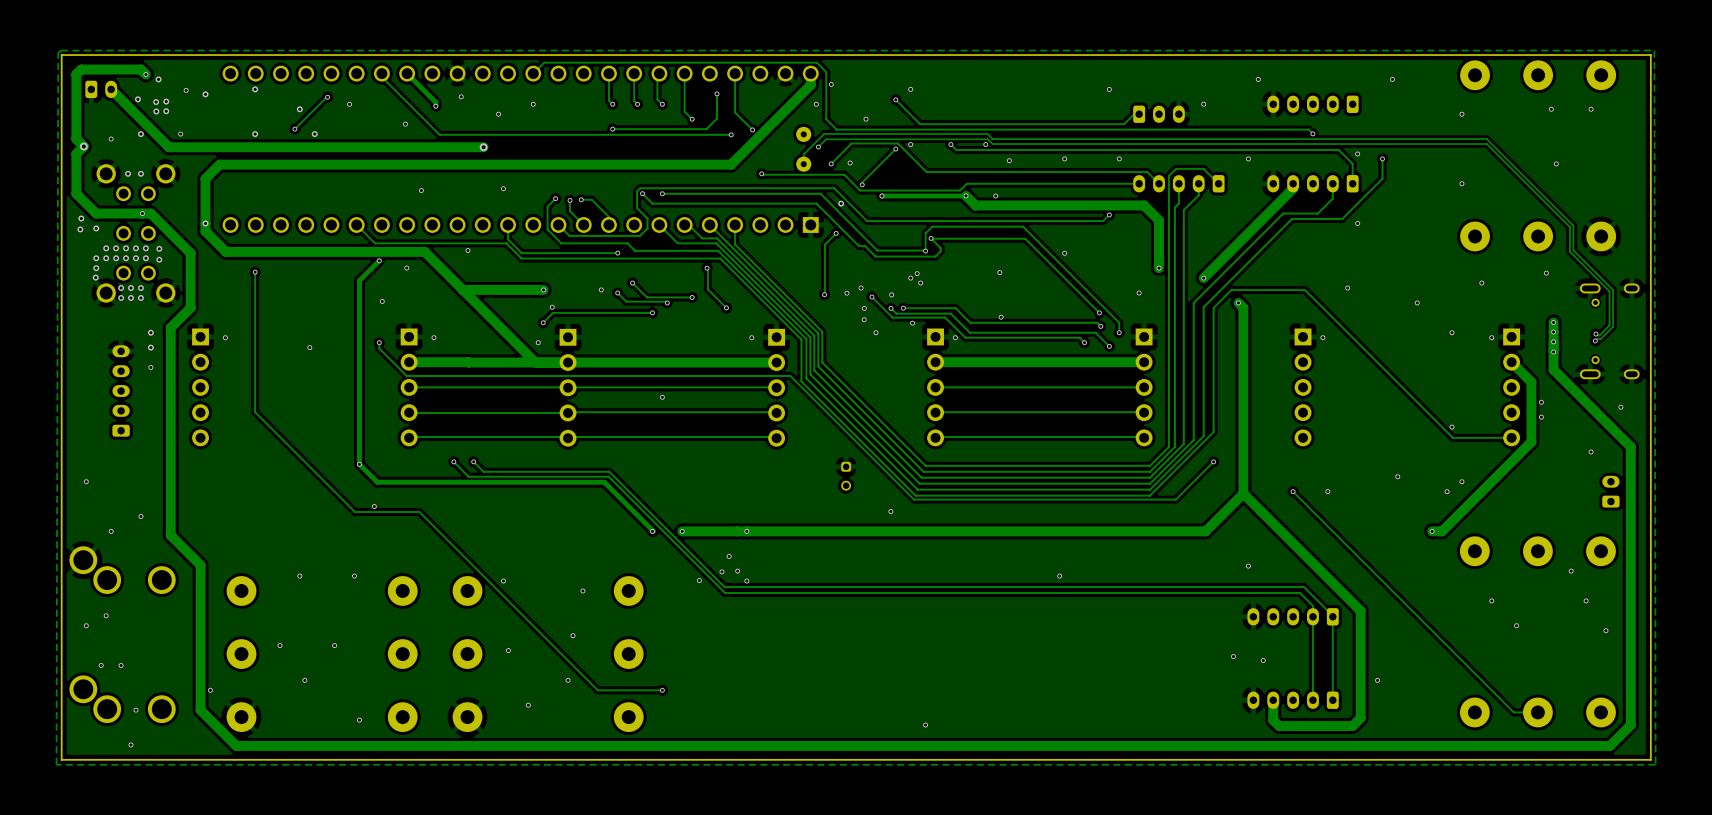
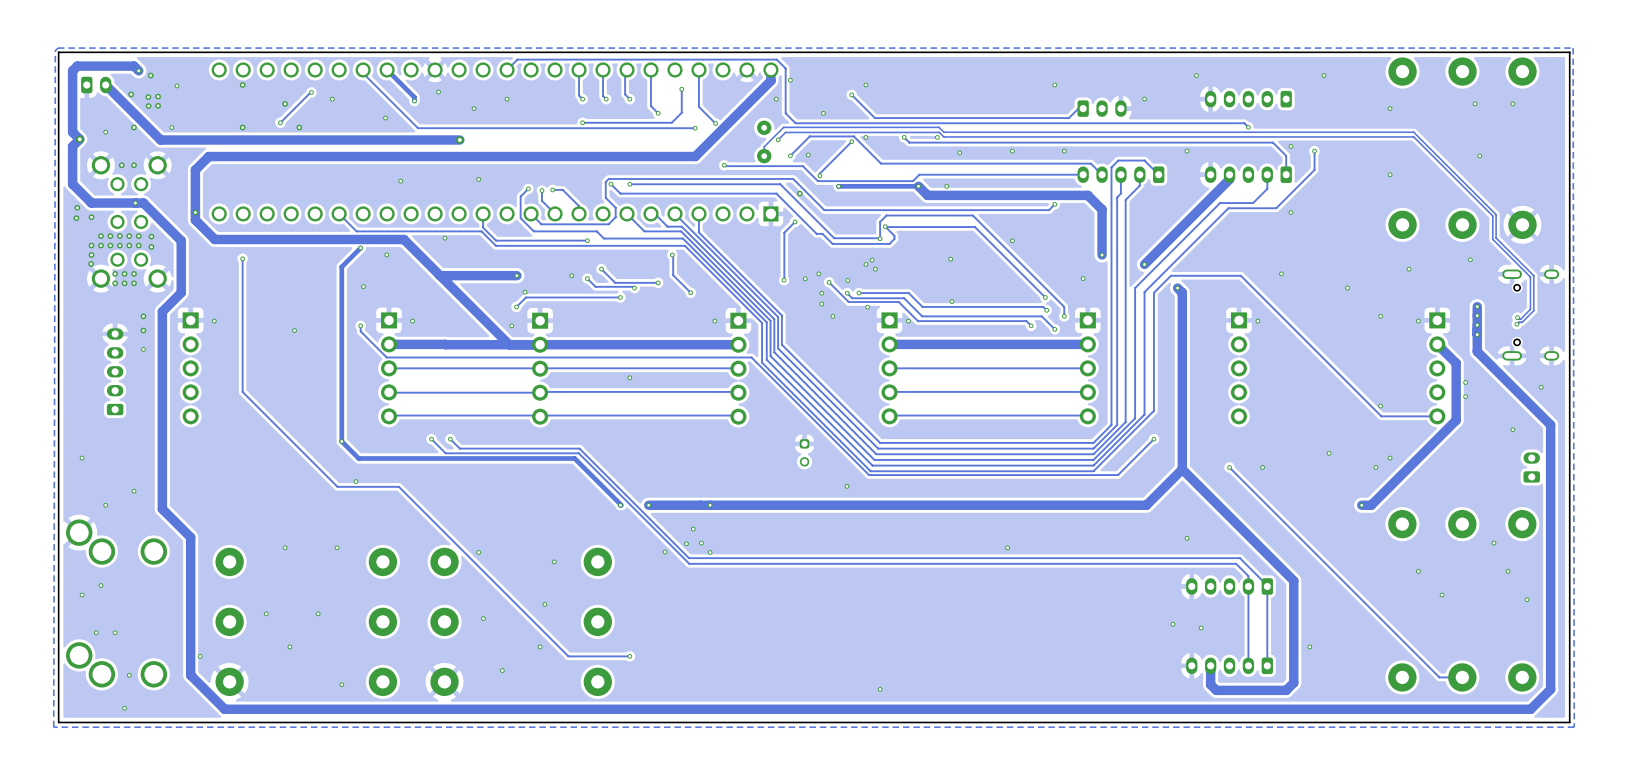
via: (205, 94) -> none

